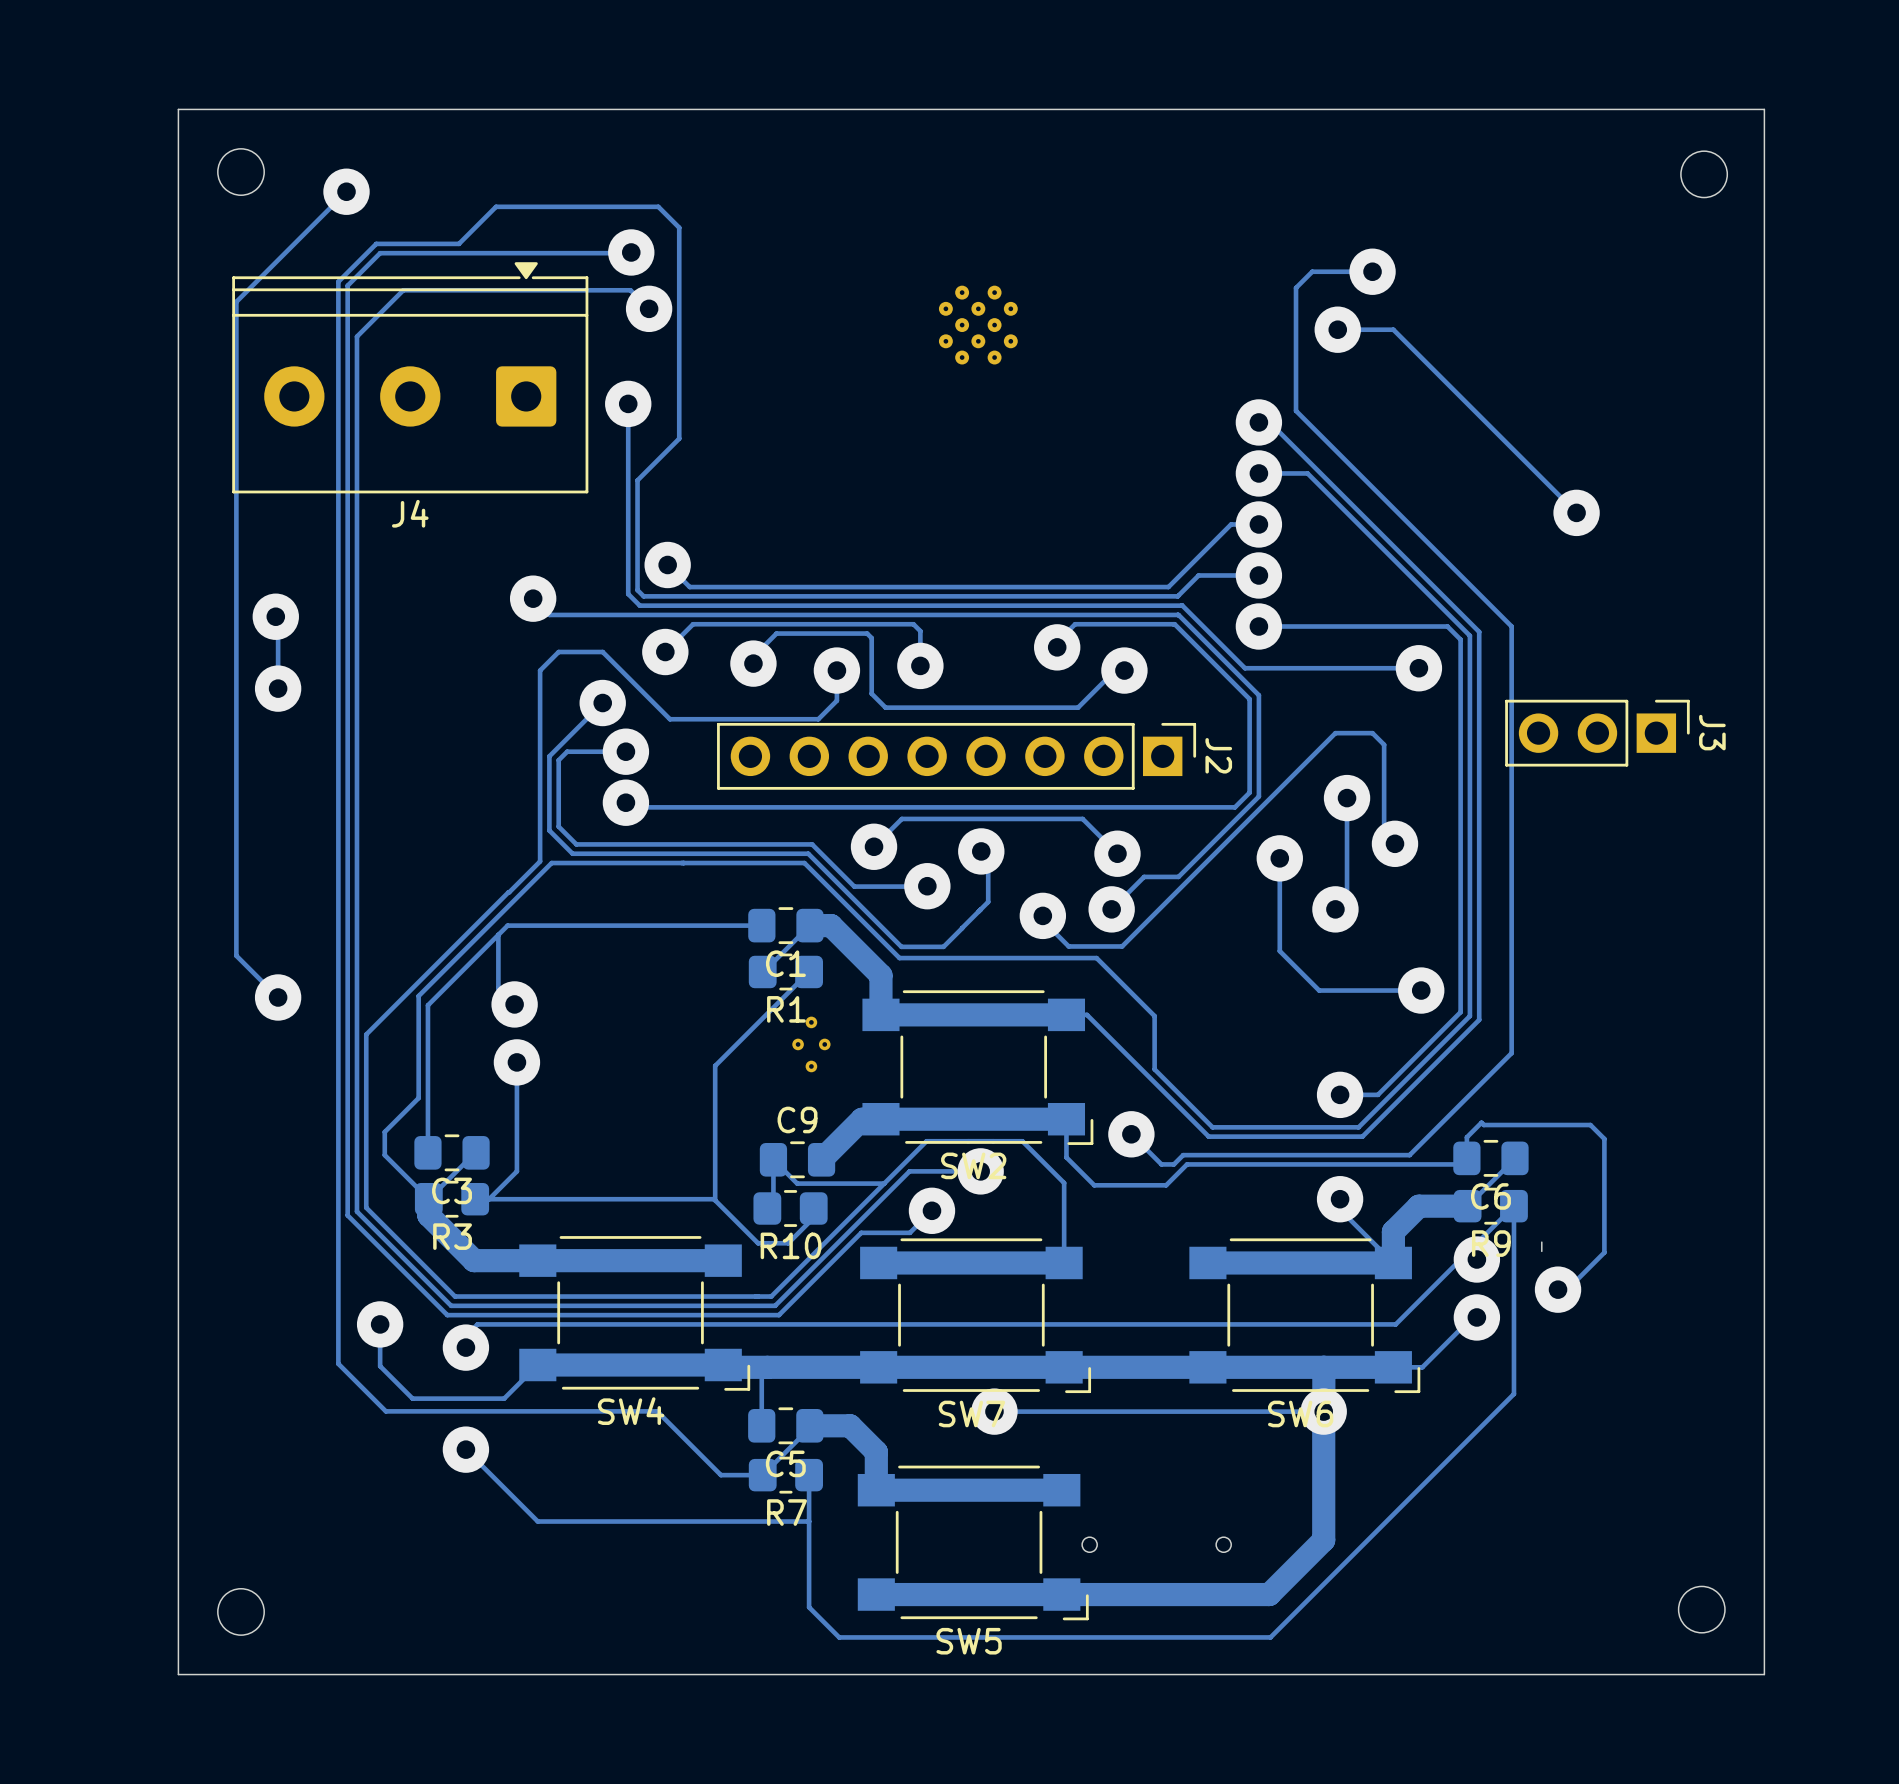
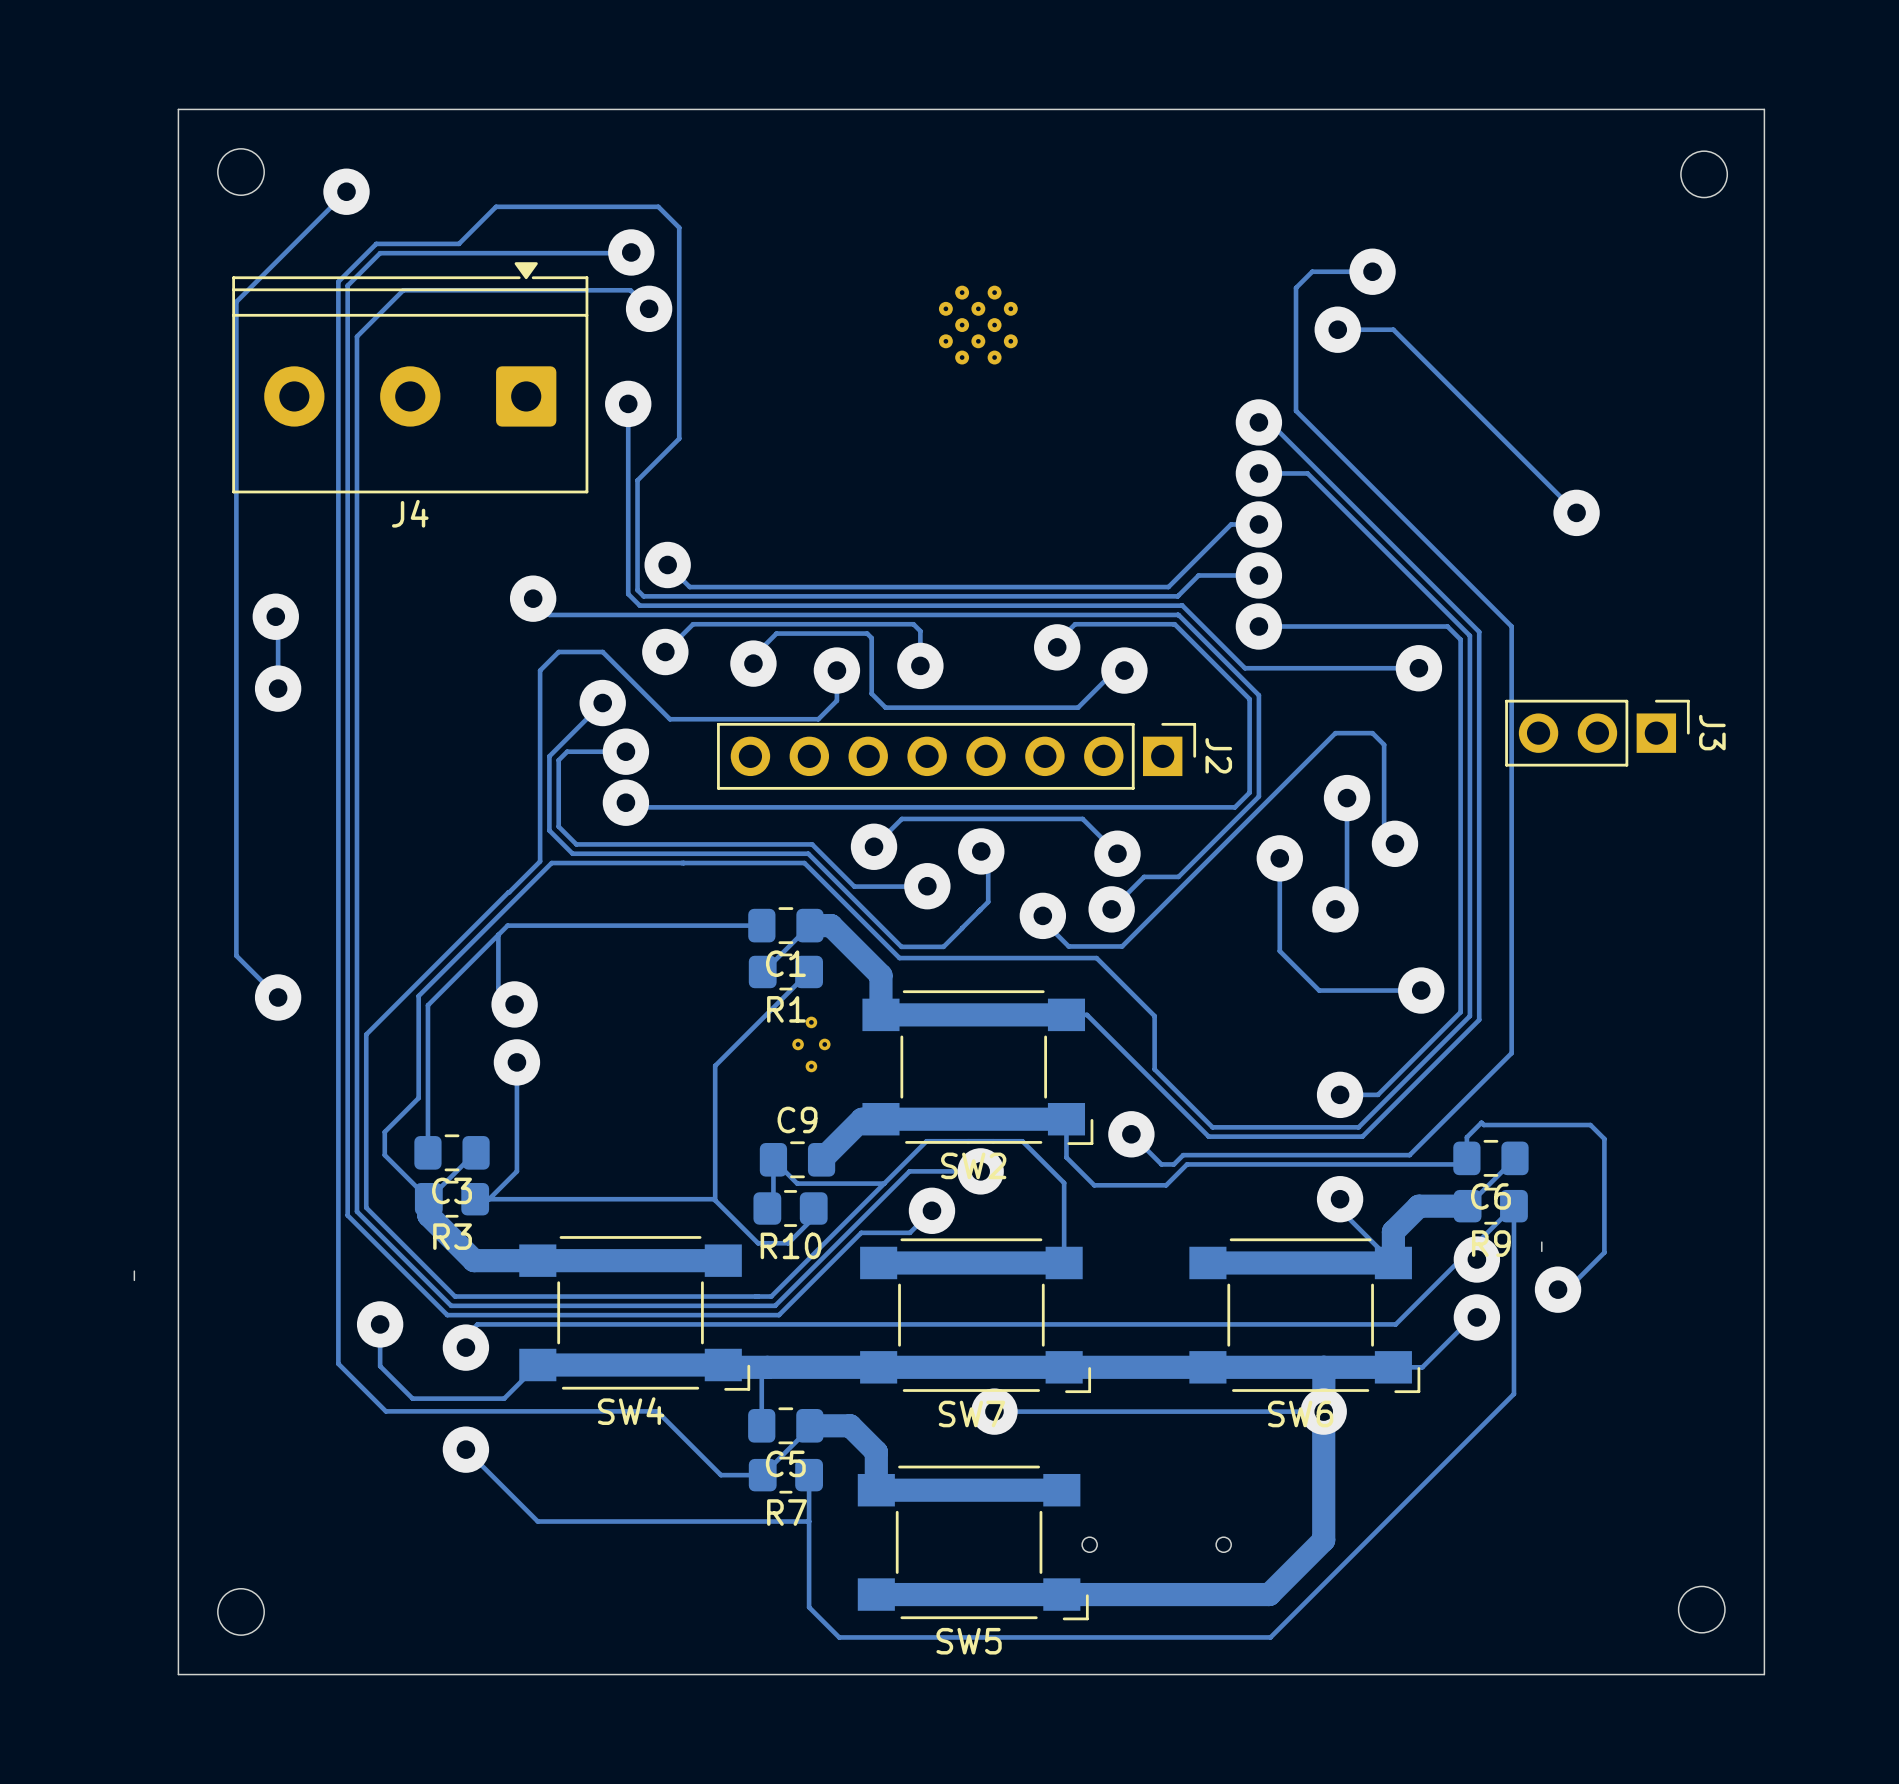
board edge: none -> (134, 1271) (134, 1280)

